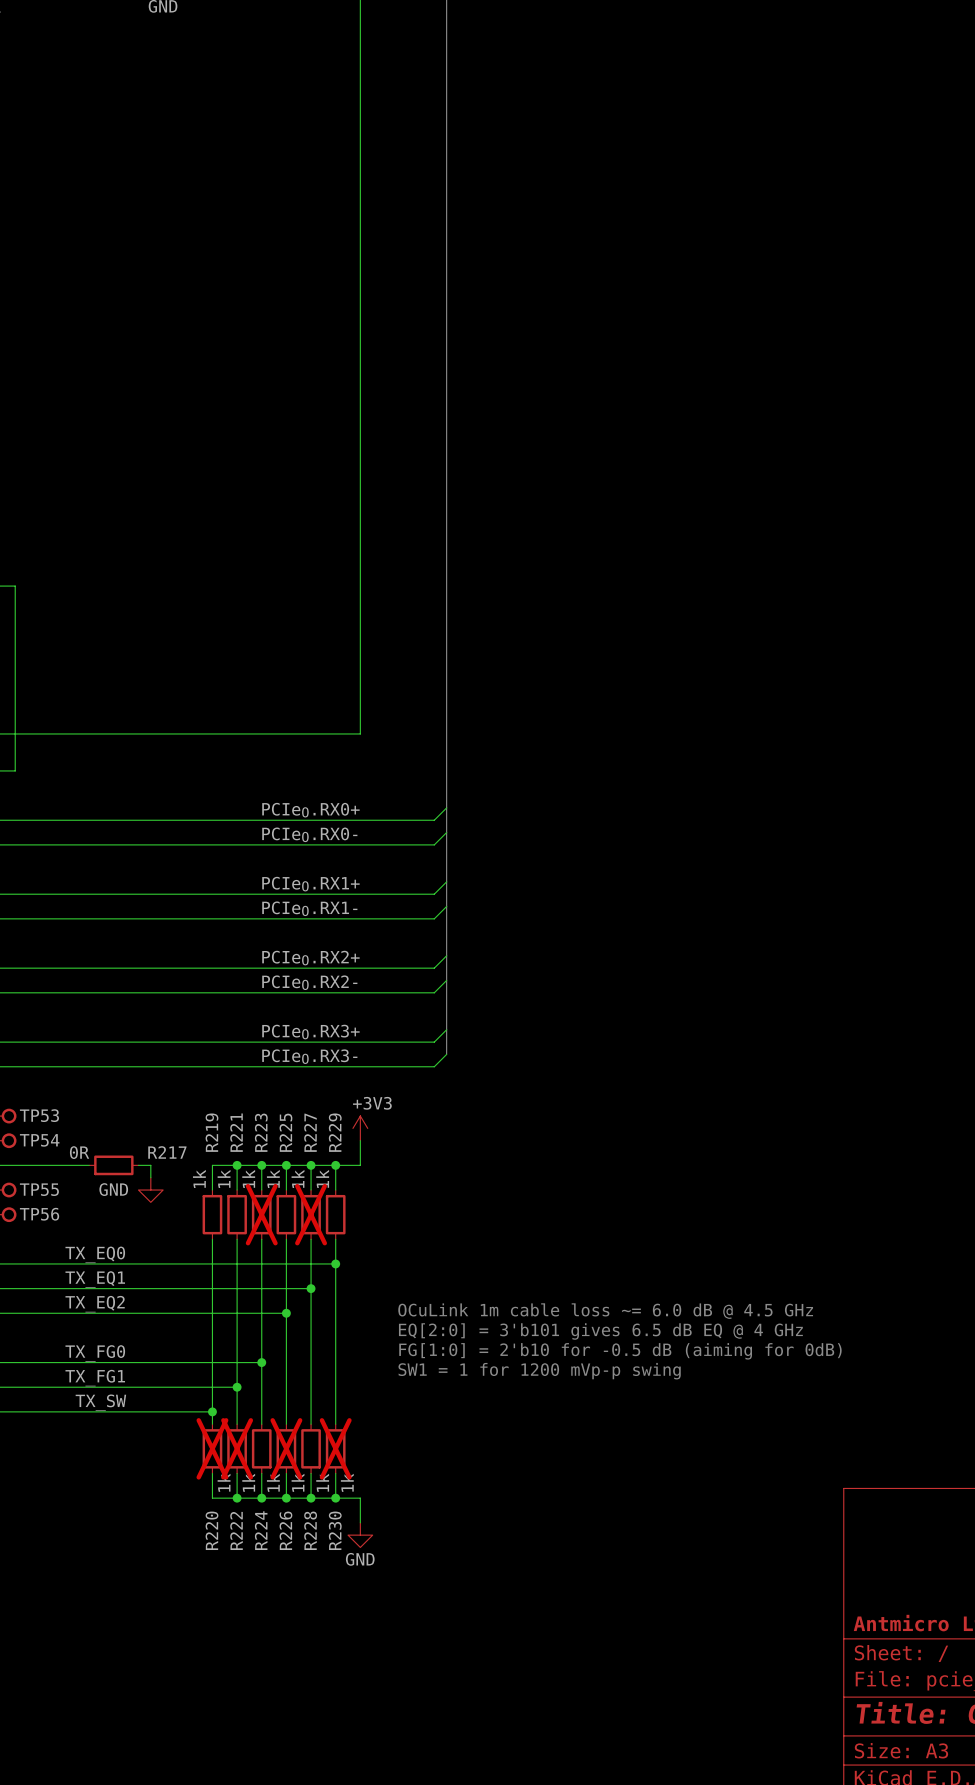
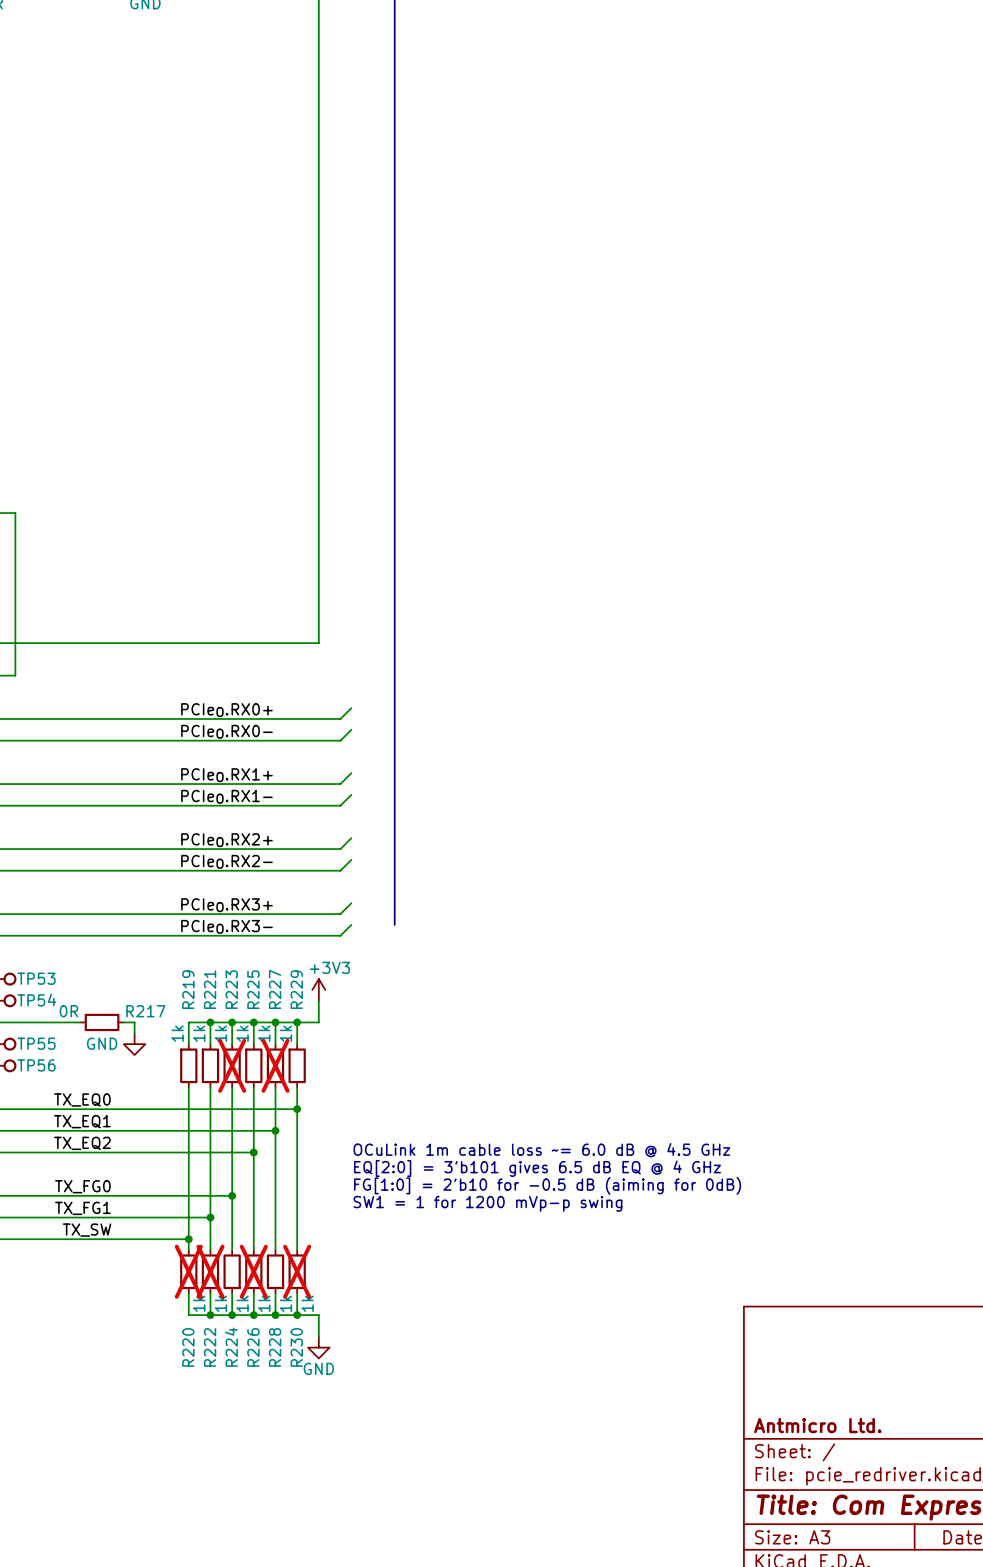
wire: (446, 807) (434, 820) (385, 820) -> (351, 708) (340, 718)
label position: PCIeO.RX0+ (310, 810) -> PCIeO.RX0+ (226, 710)
wire: (446, 832) (434, 844) (385, 844) -> (351, 729) (340, 740)
label position: PCIeO.RX0- (309, 834) -> PCIeO.RX0- (226, 731)
wire: (446, 881) (434, 894) (385, 894) -> (351, 773) (340, 784)
label position: PCIeO.RX1+ (310, 884) -> PCIeO.RX1+ (226, 775)
wire: (446, 906) (434, 918) (385, 918) -> (351, 794) (340, 805)
label position: PCIeO.RX1- (309, 908) -> PCIeO.RX1- (226, 796)
wire: (446, 955) (434, 968) (385, 968) -> (351, 838) (340, 849)
label position: PCIeO.RX2+ (310, 958) -> PCIeO.RX2+ (226, 840)
wire: (446, 980) (434, 992) (385, 992) -> (351, 859) (340, 870)
label position: PCIeO.RX2- (309, 982) -> PCIeO.RX2- (226, 861)
wire: (446, 1029) (434, 1042) (385, 1042) -> (351, 903) (340, 914)
label position: PCIeO.RX3+ (310, 1032) -> PCIeO.RX3+ (226, 905)
wire: (446, 1054) (434, 1066) (385, 1066) -> (351, 924) (340, 935)
label position: PCIeO.RX3- (309, 1056) -> PCIeO.RX3- (226, 926)

